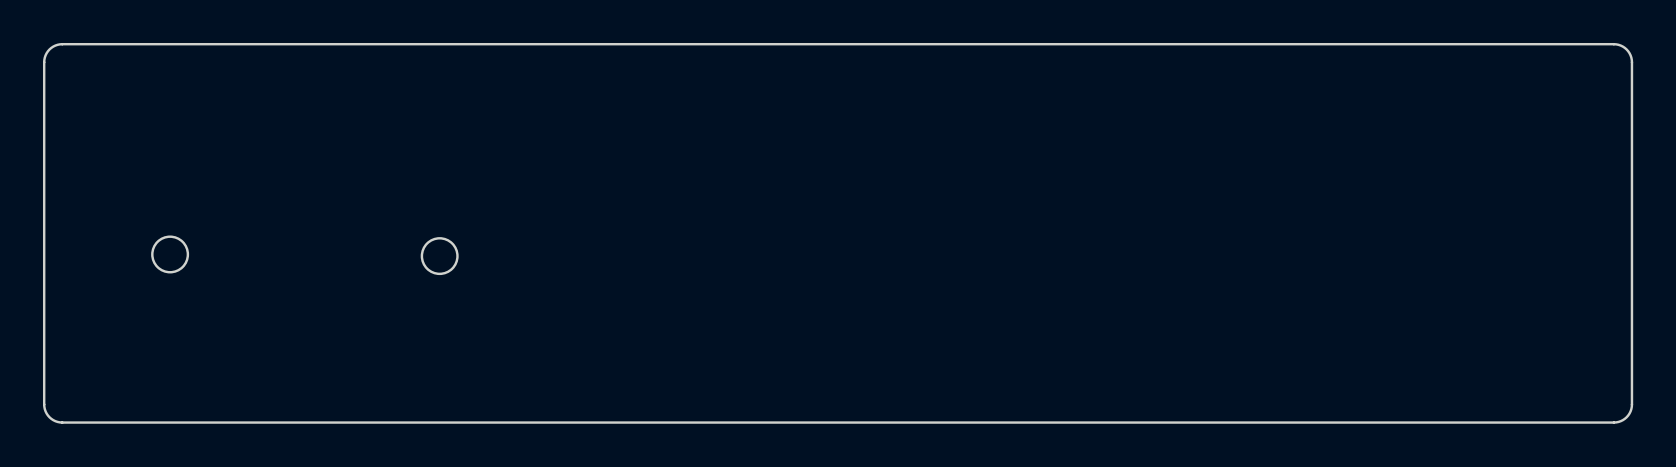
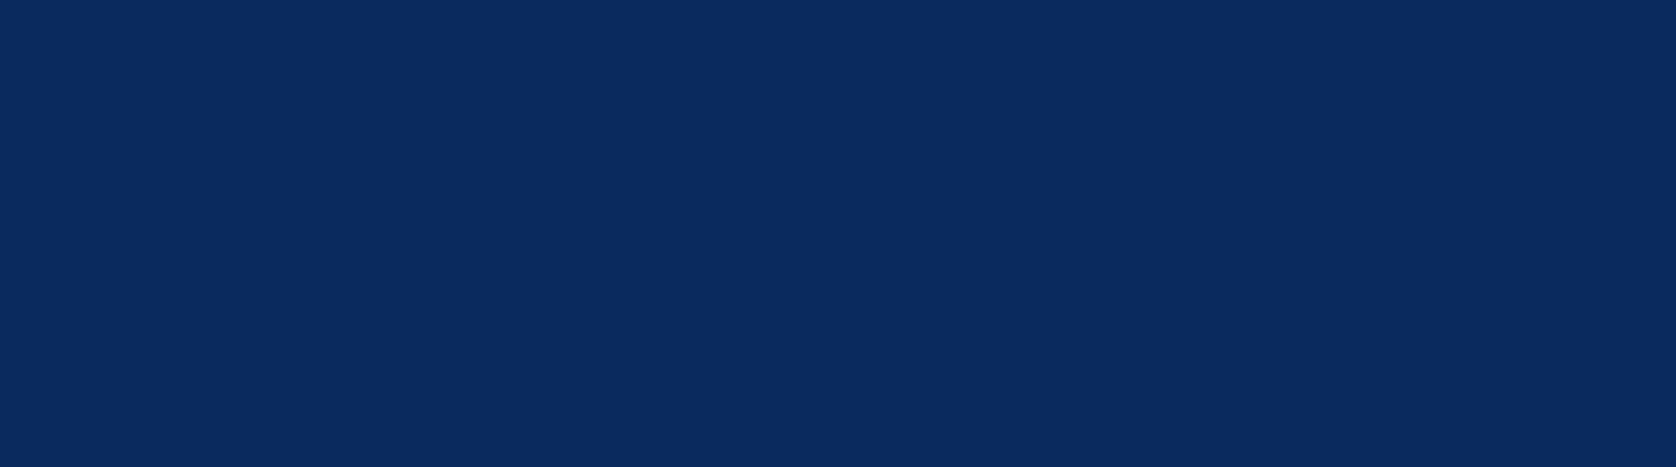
board edge: (62, 44) (1618, 44) (1628, 51) (1631, 62) (1631, 409) (1624, 418) (1613, 422) (57, 421) (47, 415) (44, 404) (44, 62) (49, 49) (62, 44) -> none
round board edge: [151, 235, 190, 274] -> none
round board edge: [420, 237, 459, 276] -> none

